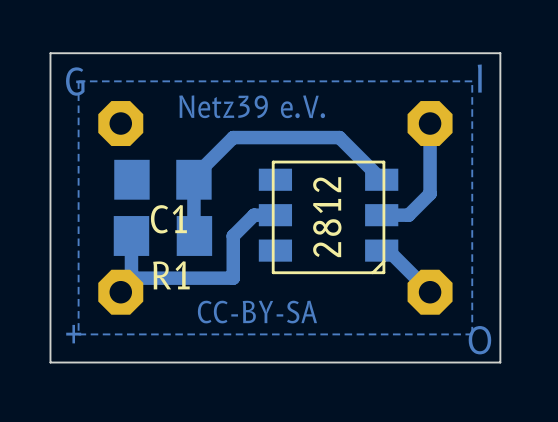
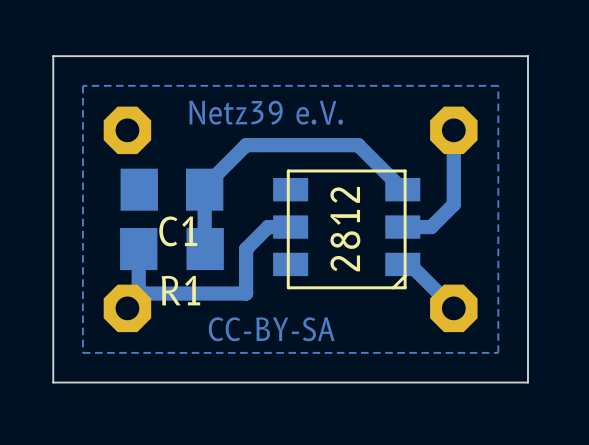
text: I (479, 78) -> none
text: G (75, 81) -> none
text: + (73, 334) -> none
text: O (479, 340) -> none

